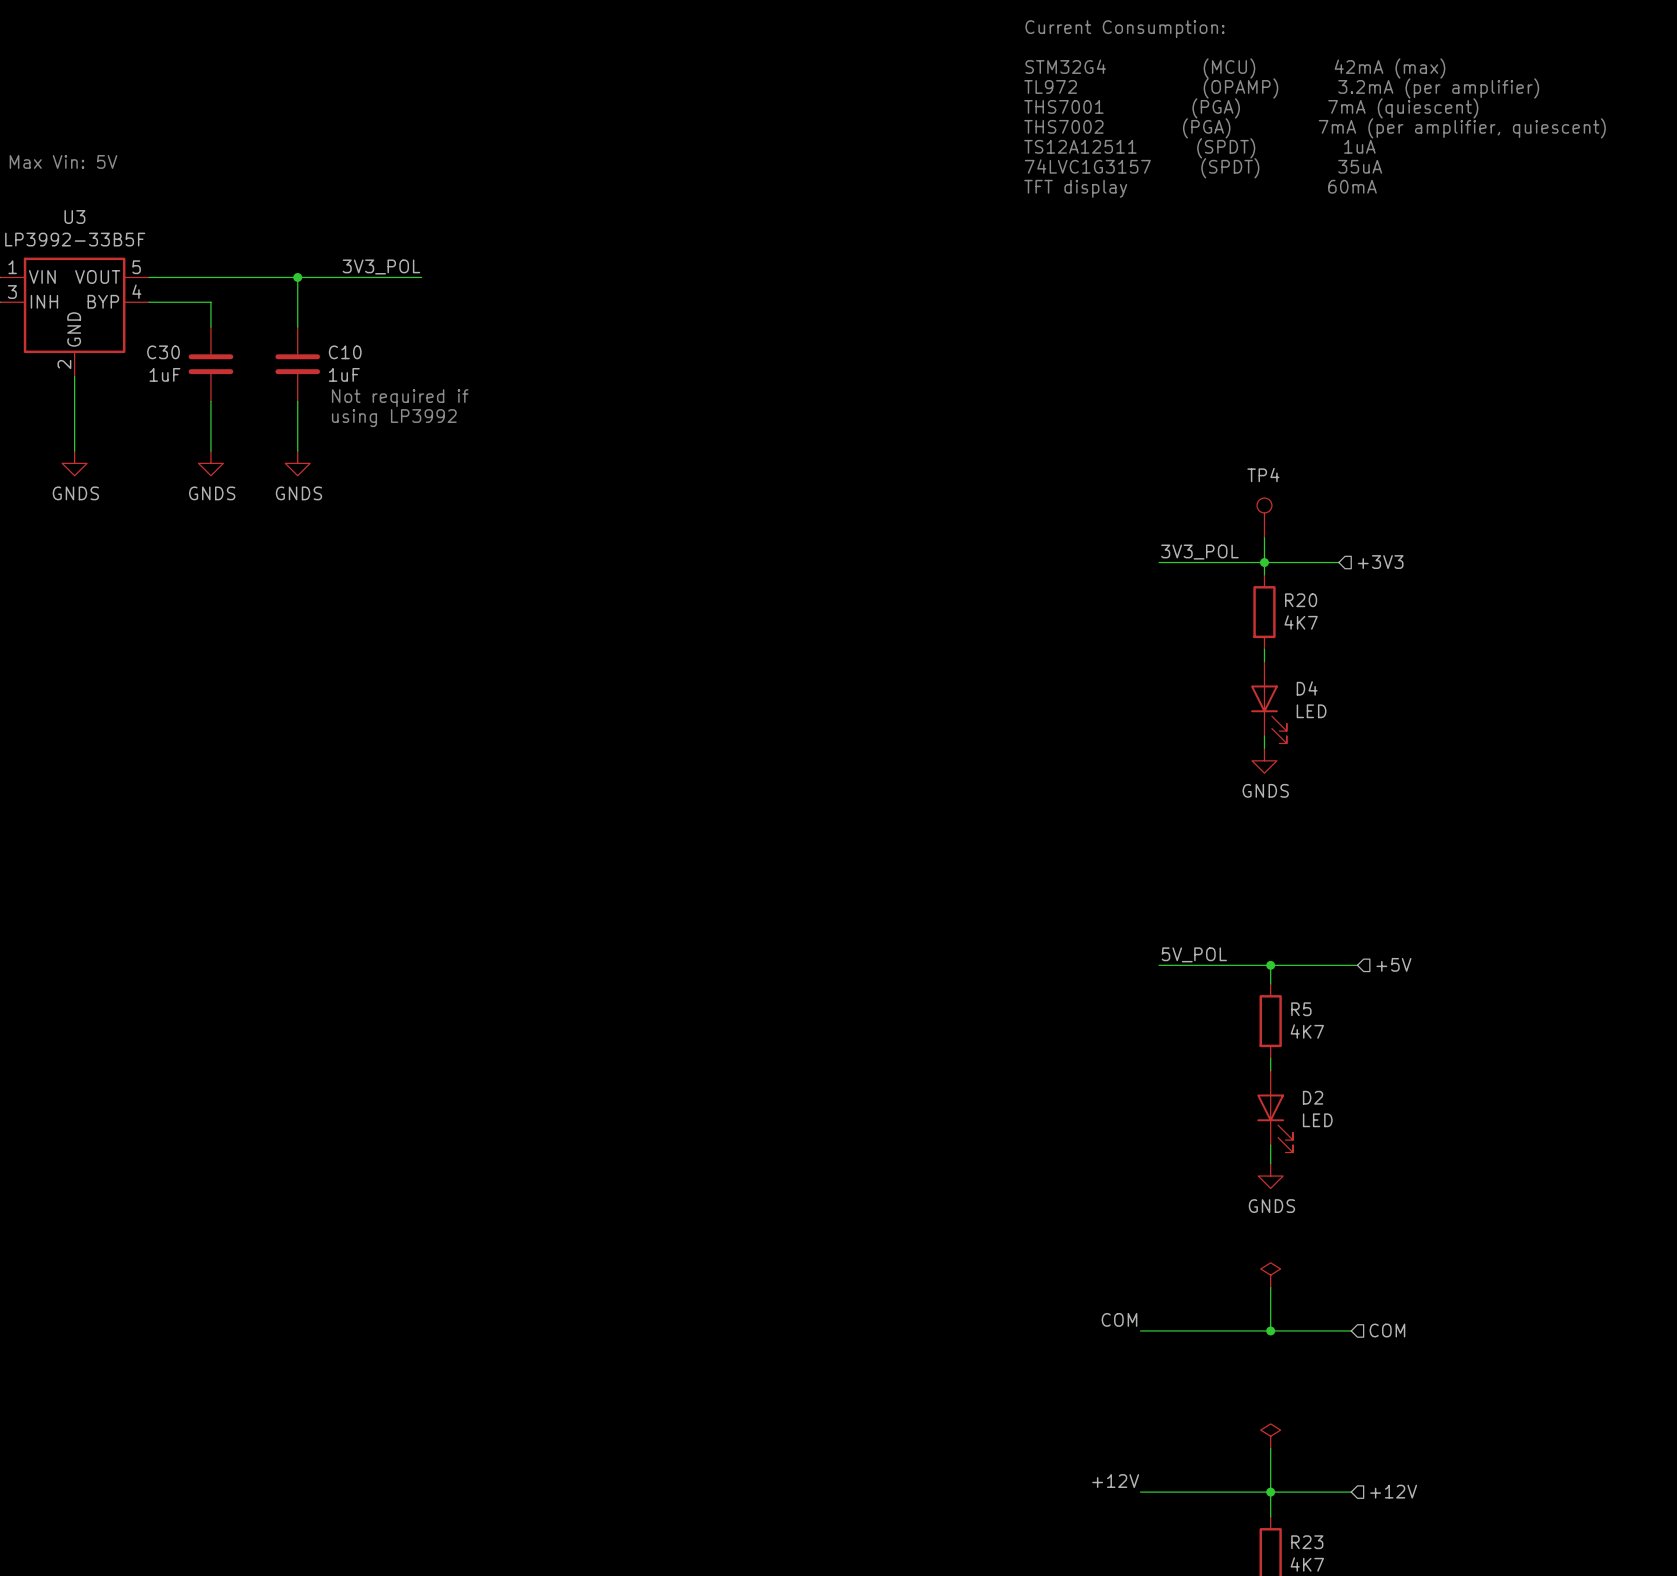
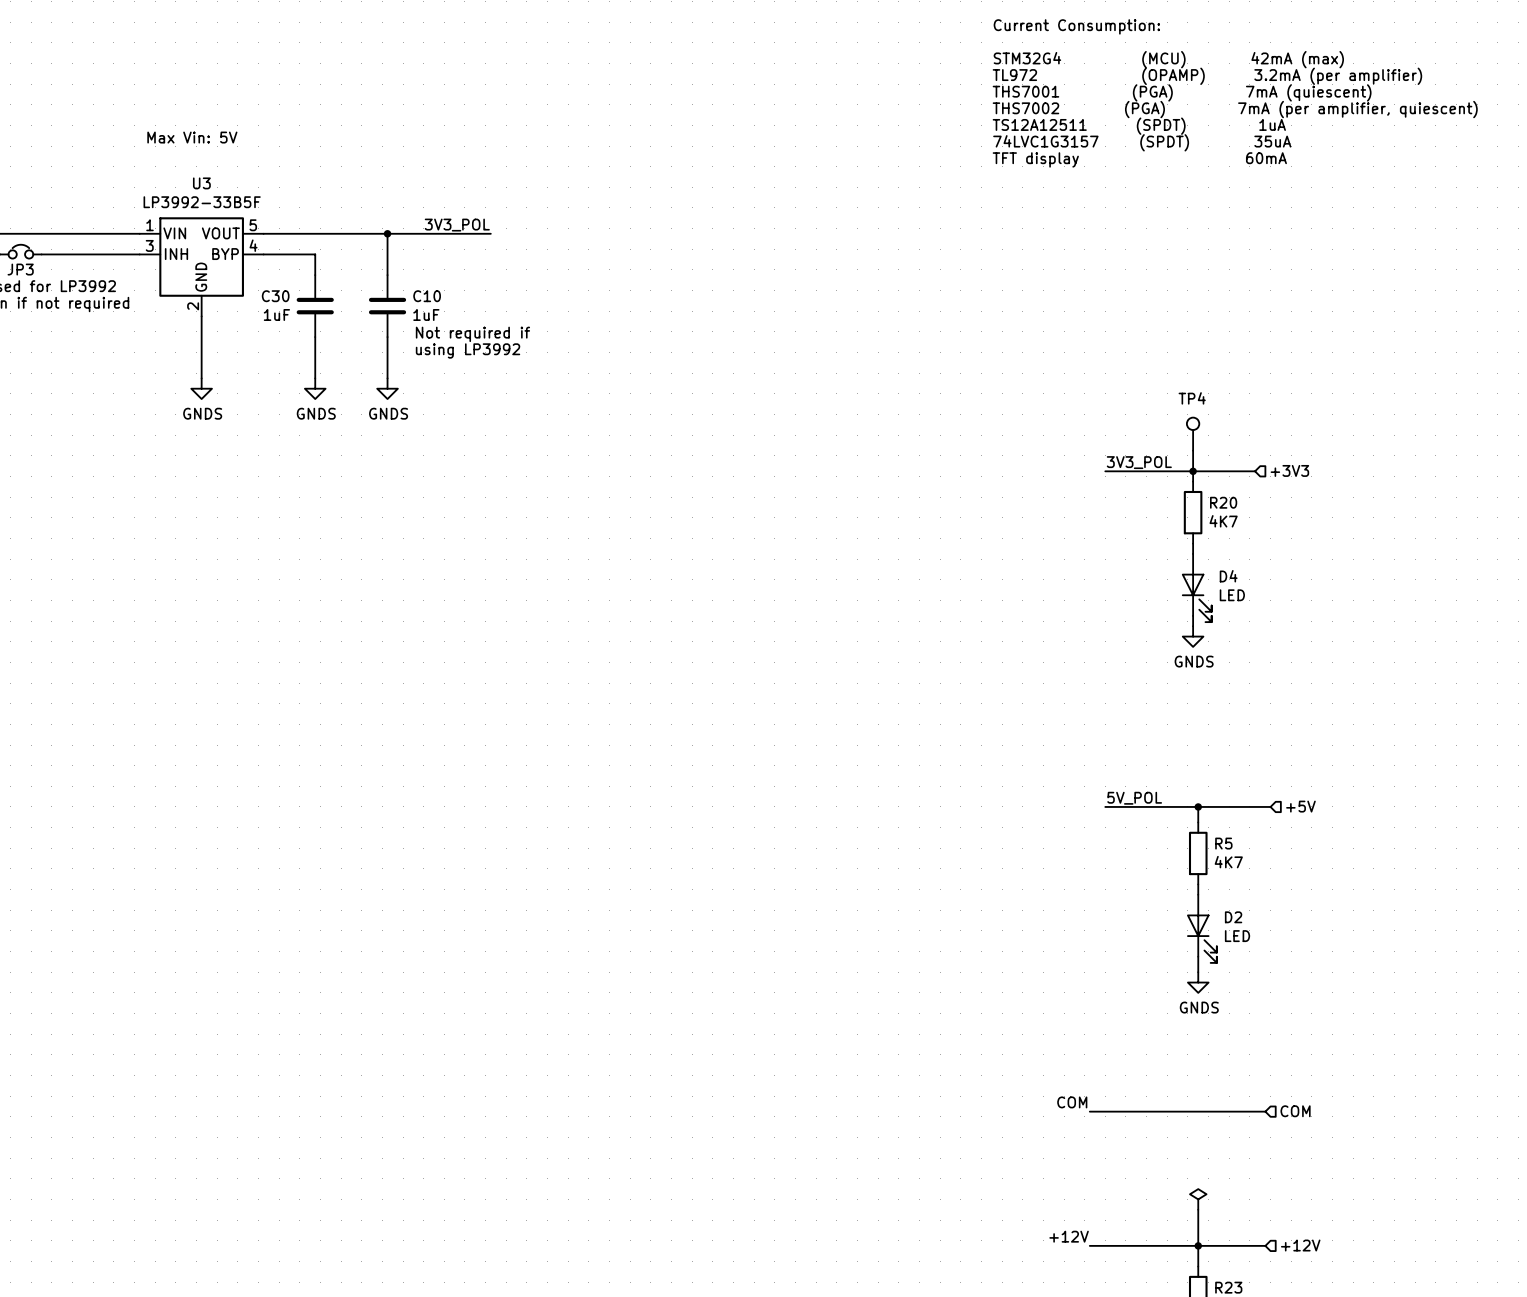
power symbol: (1270, 1275) -> none
wire: (1270, 1287) (1270, 1330) -> none
junction: (1270, 1330) -> none

